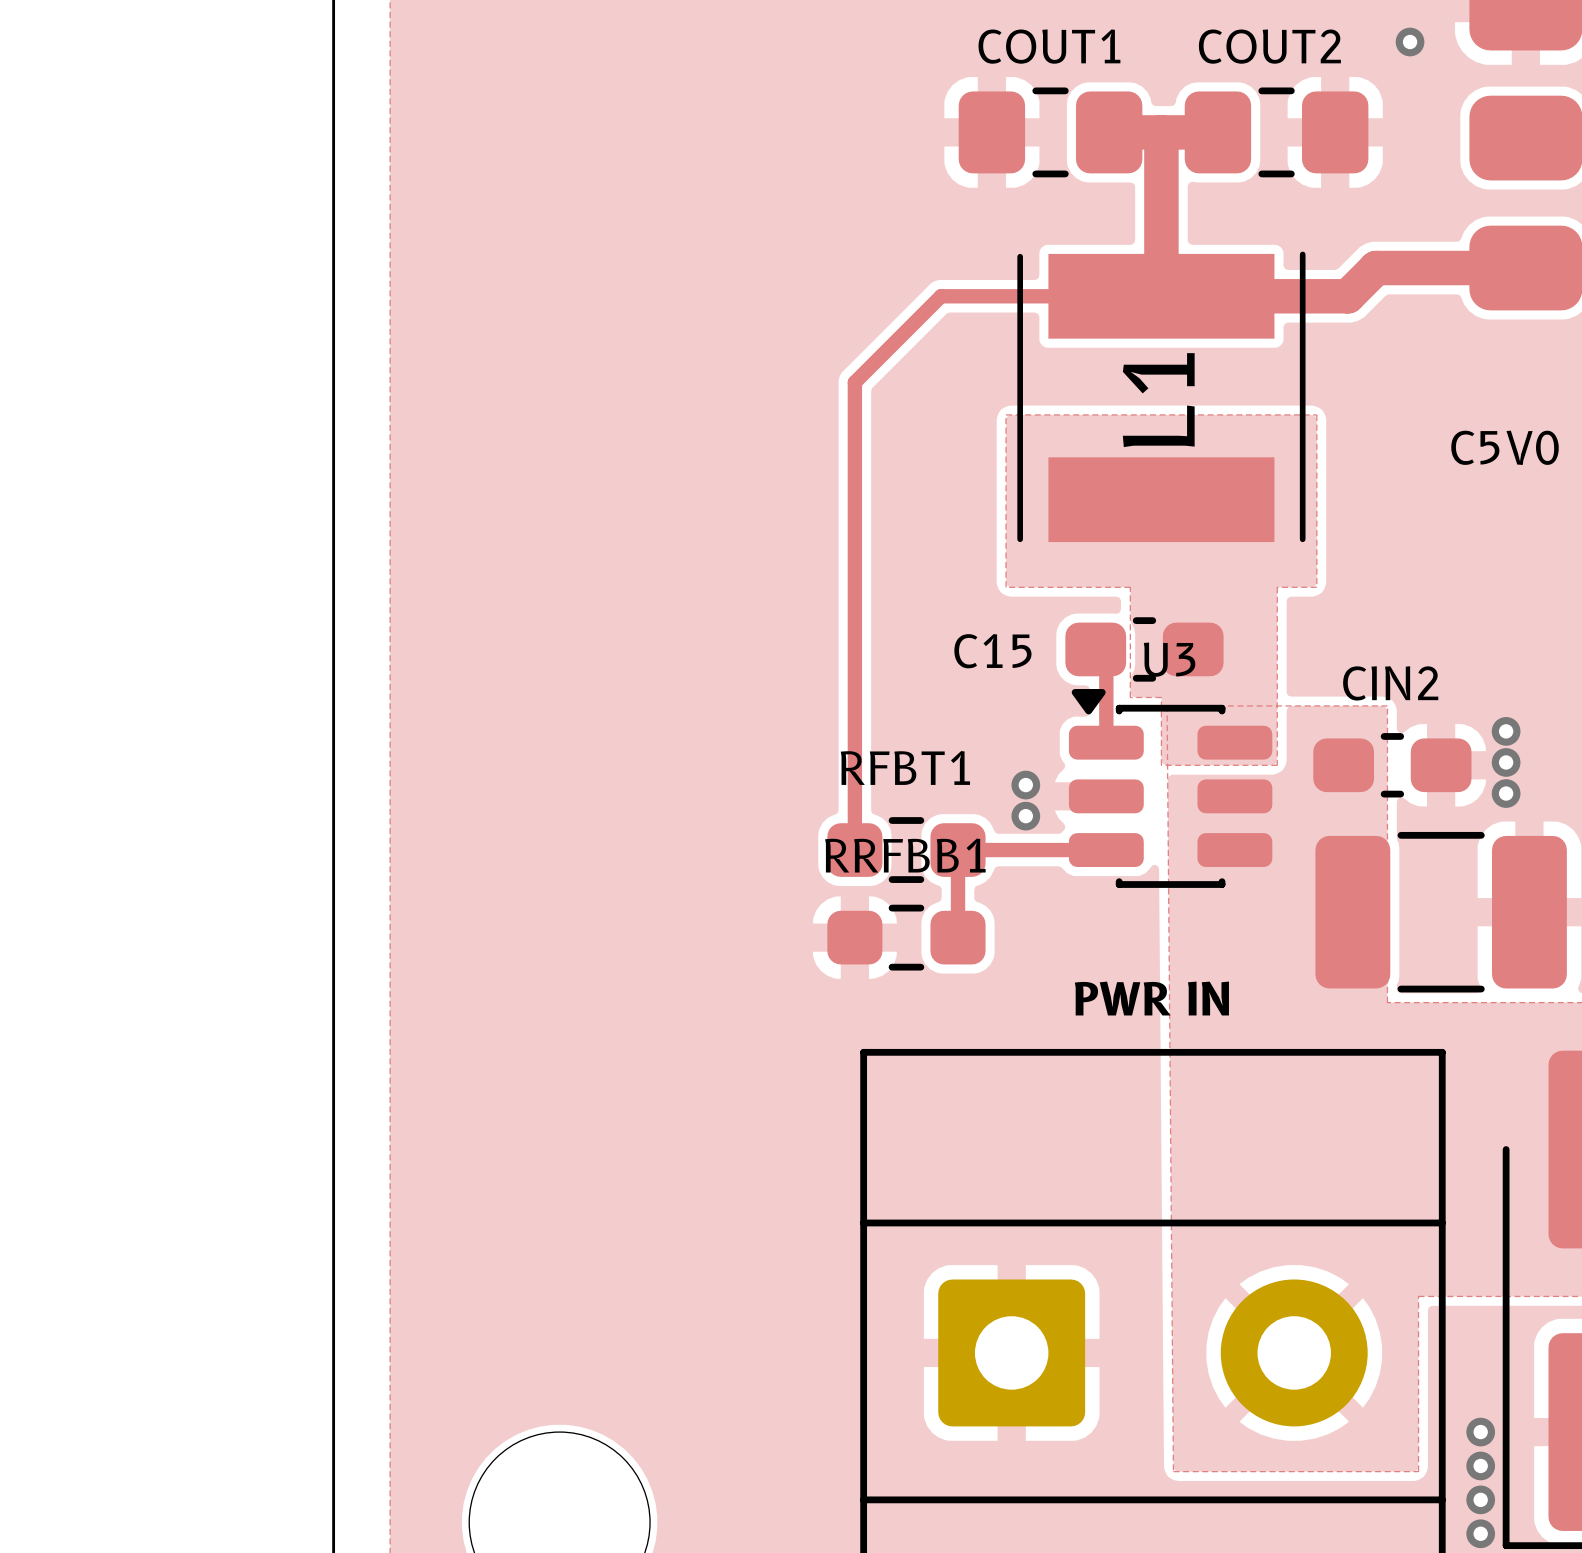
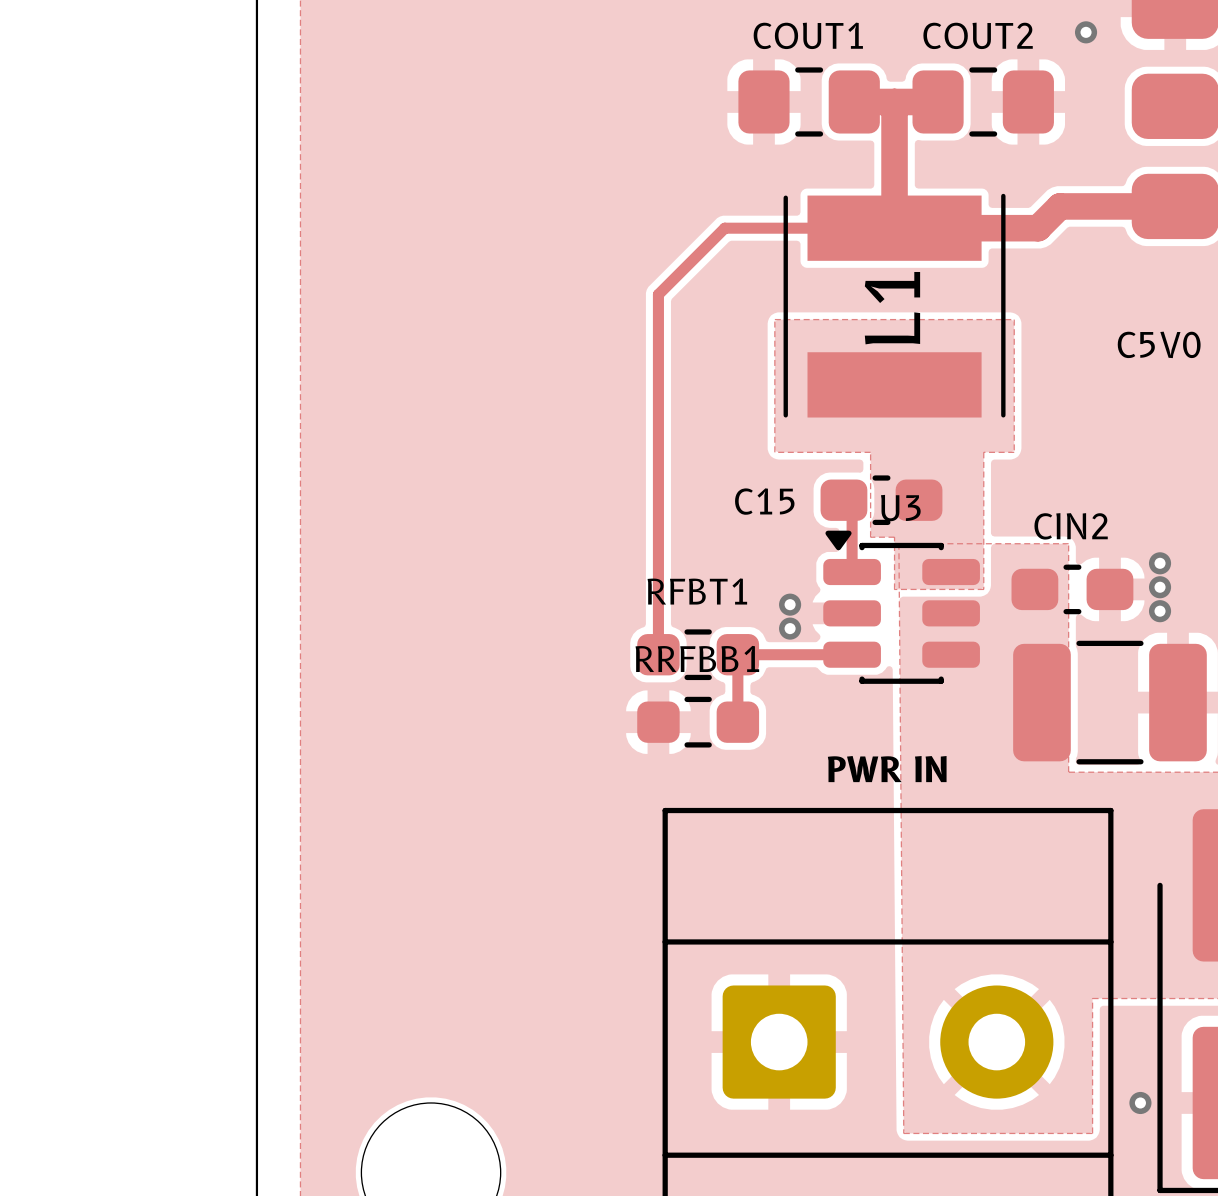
via: (1480, 1465) -> none
via: (1480, 1499) -> none
via: (1480, 1533) -> none

